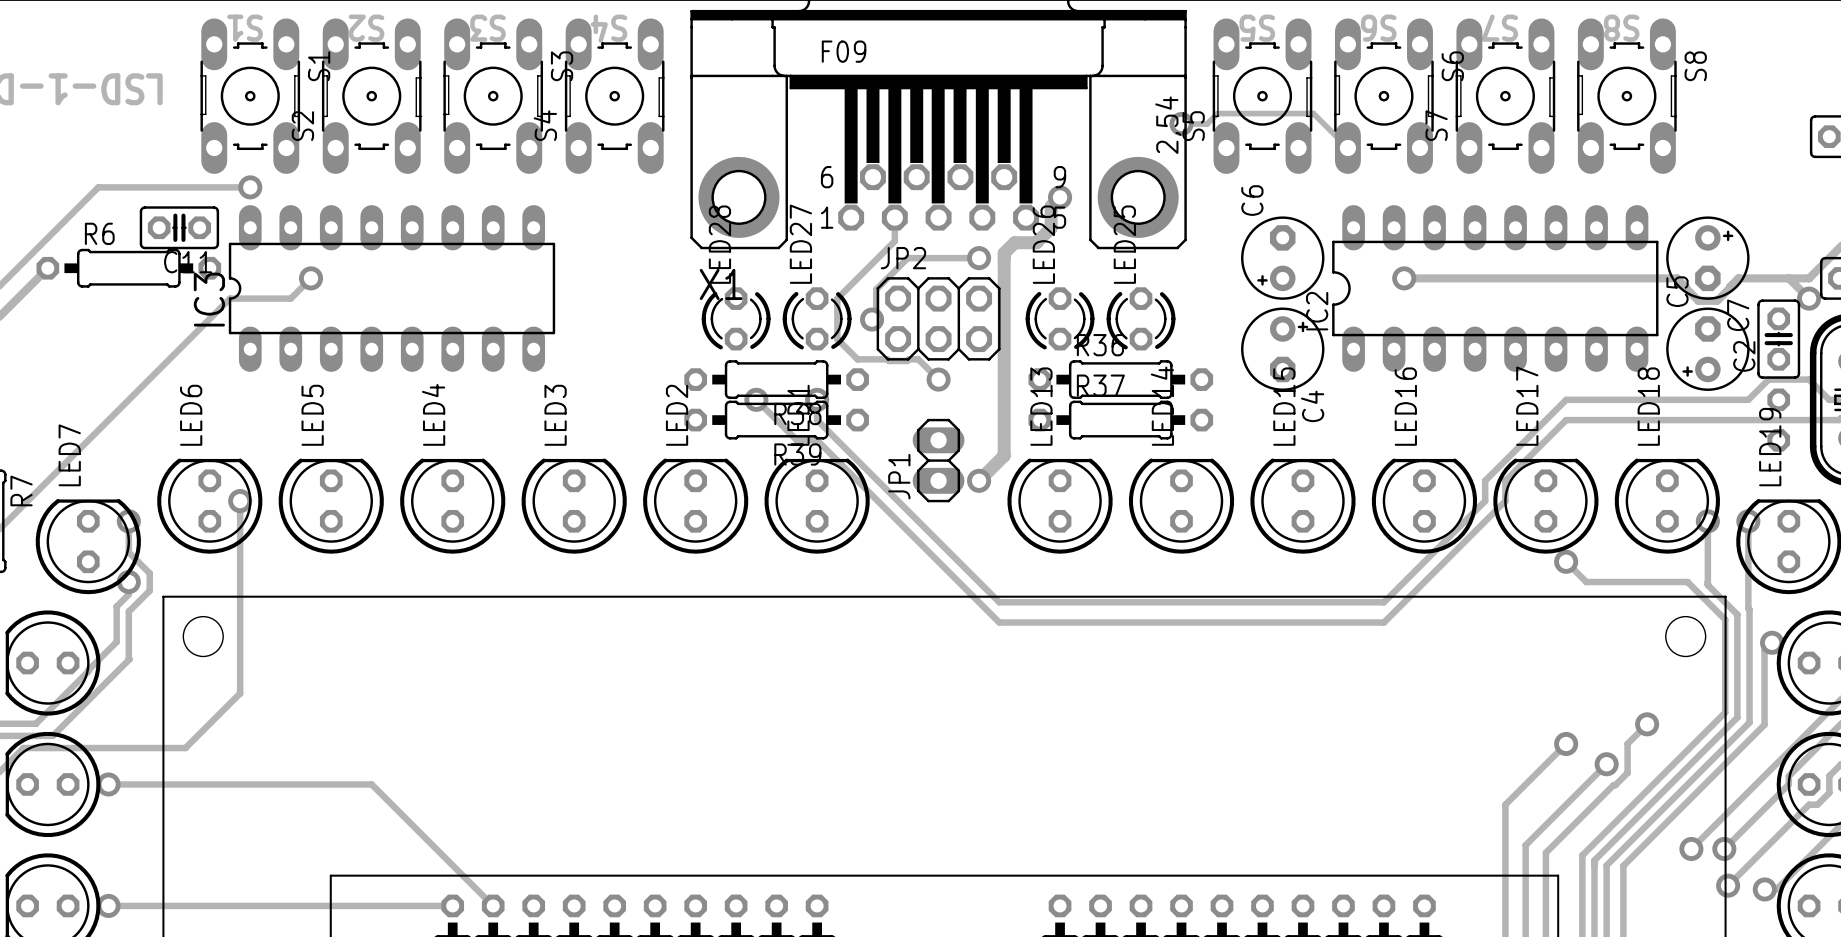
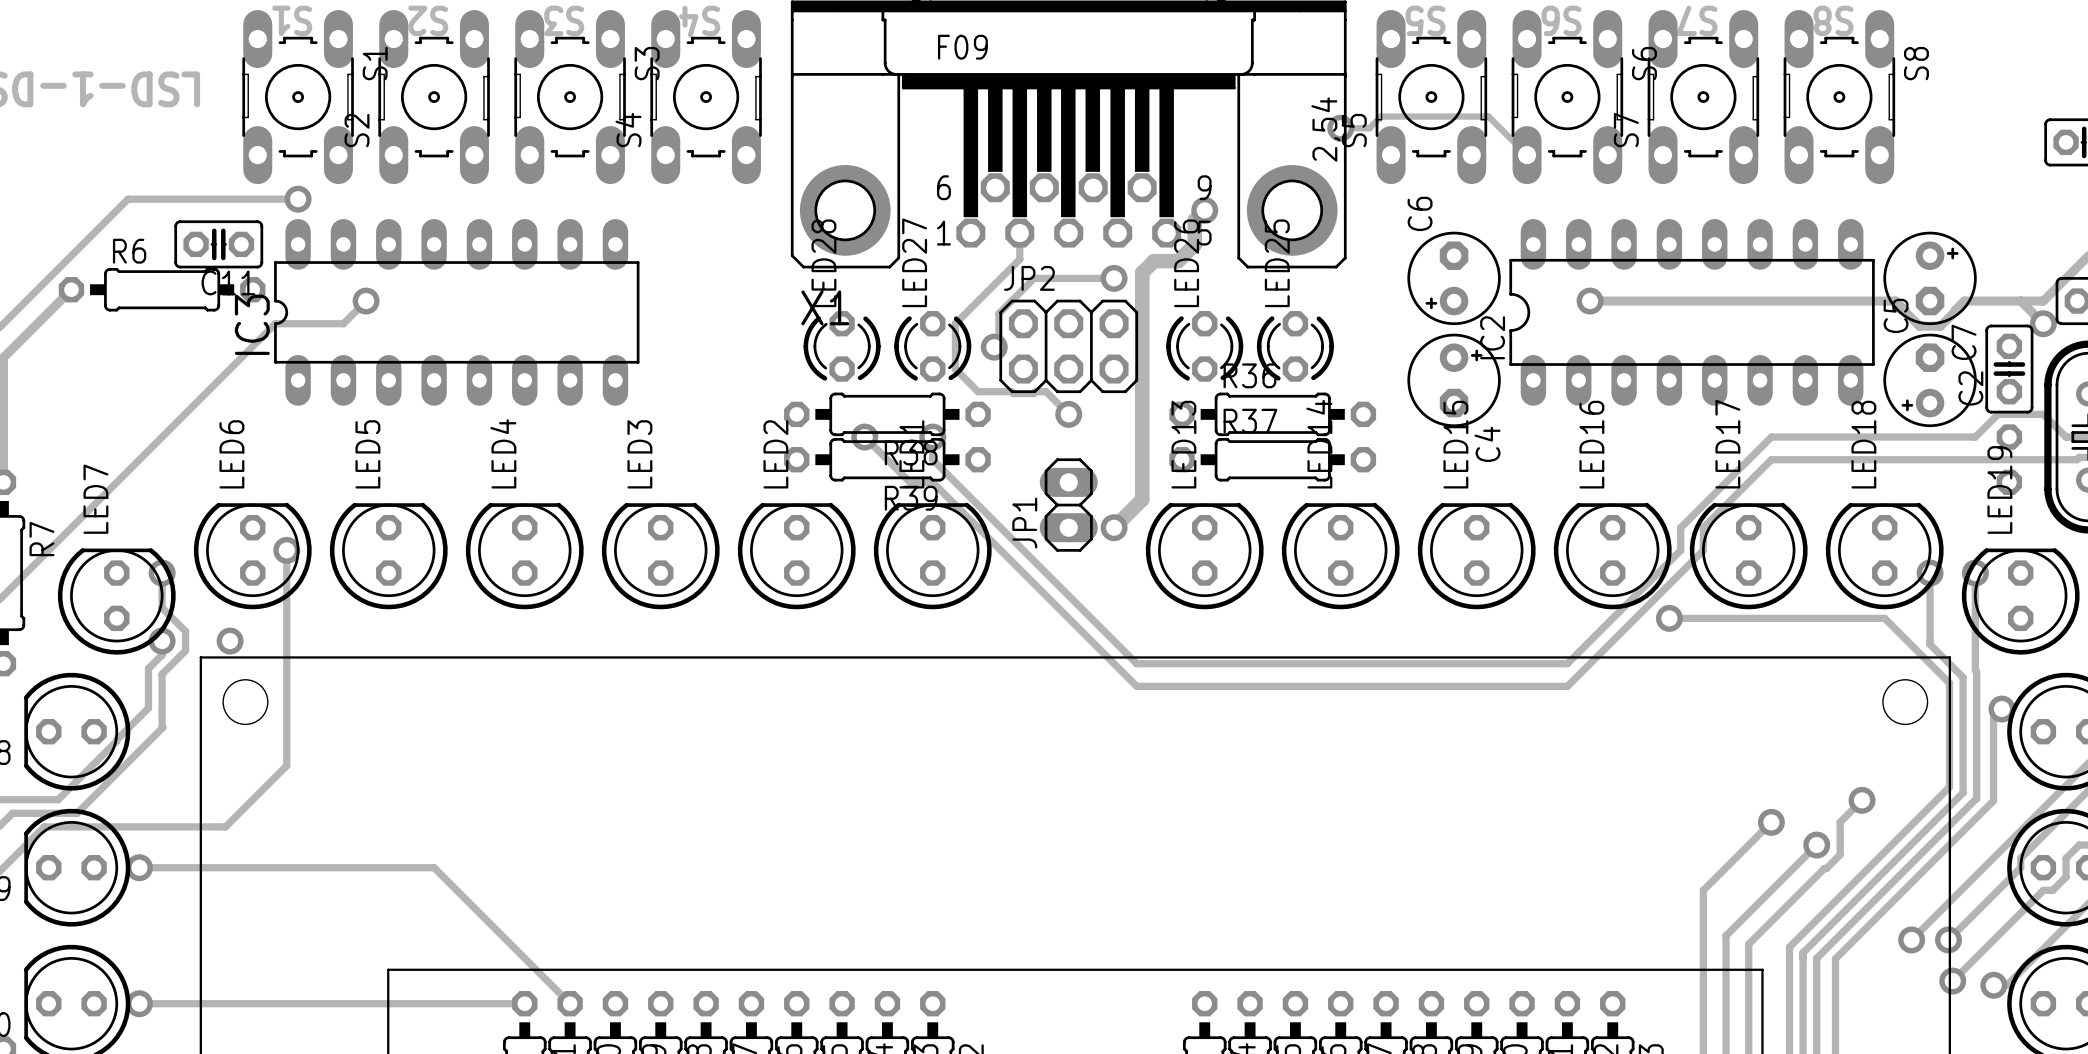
track: (1566, 561) (1586, 582) (1687, 582) -> (1669, 618) (1884, 618) (1907, 641)
via position: (1566, 561) -> (1669, 618)
via: none -> (230, 641)

